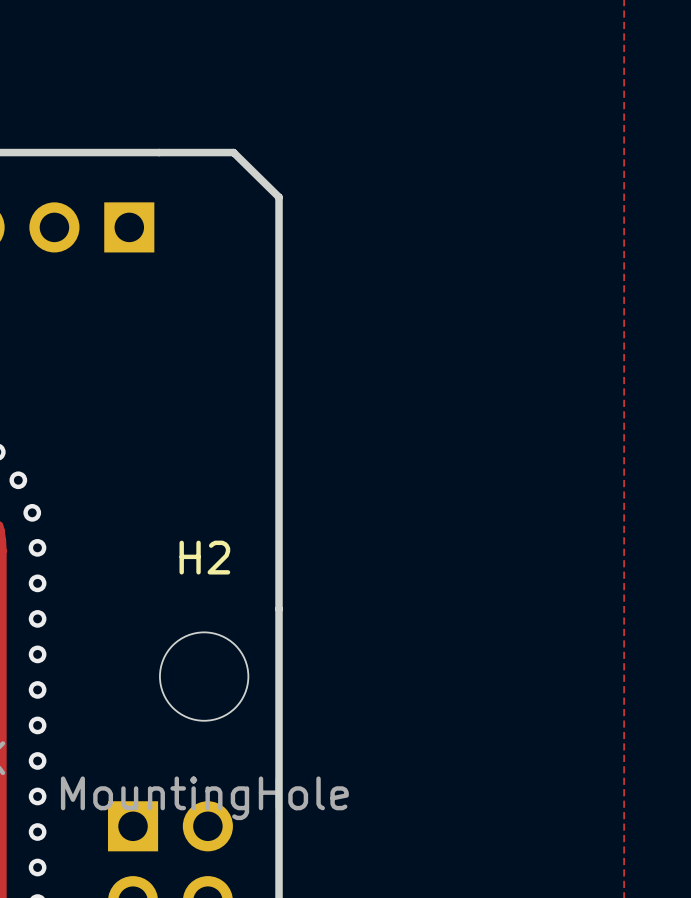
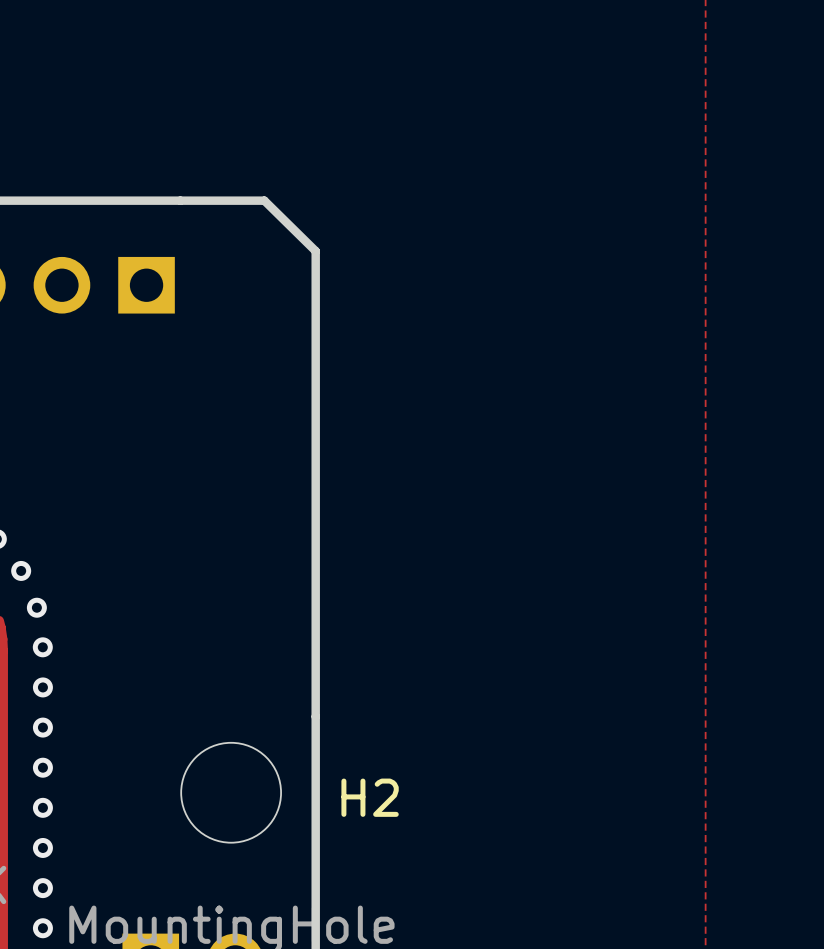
H2 name position: H2 (204, 557) -> H2 (370, 797)

